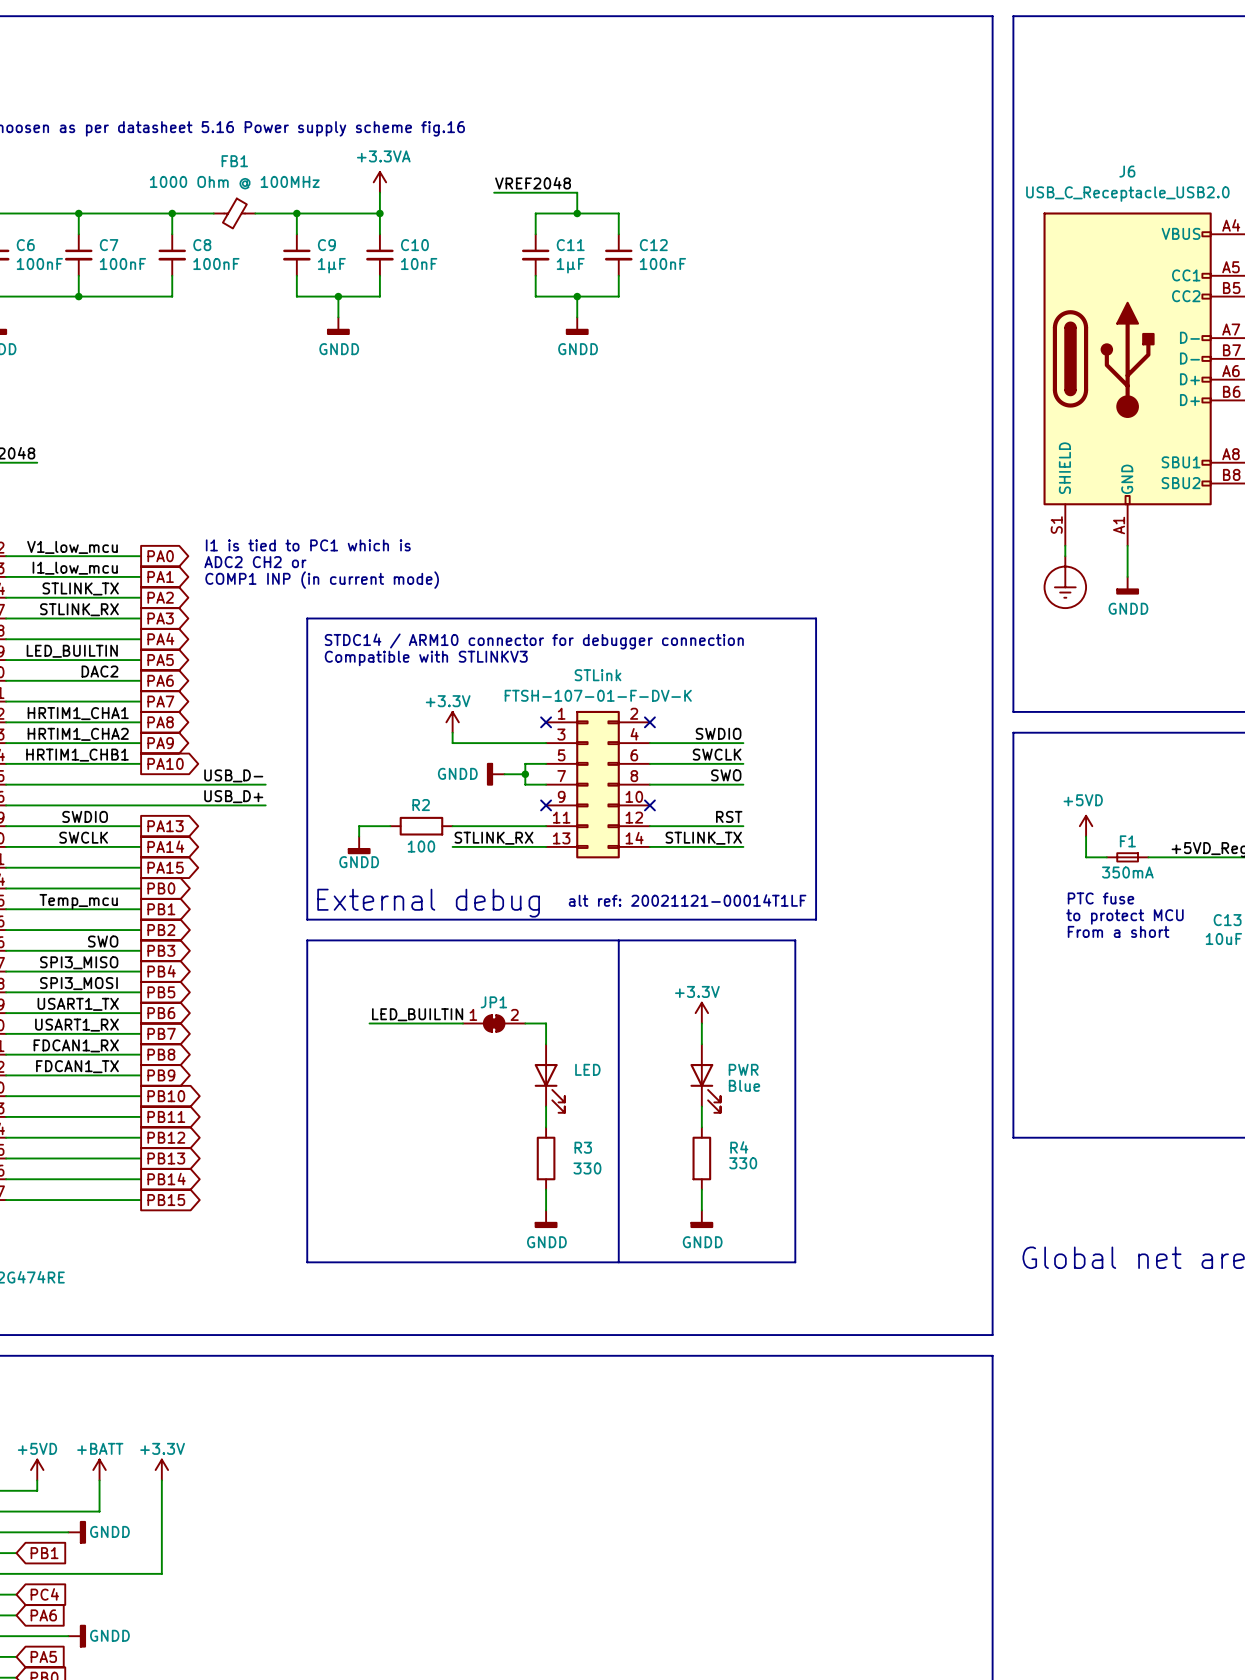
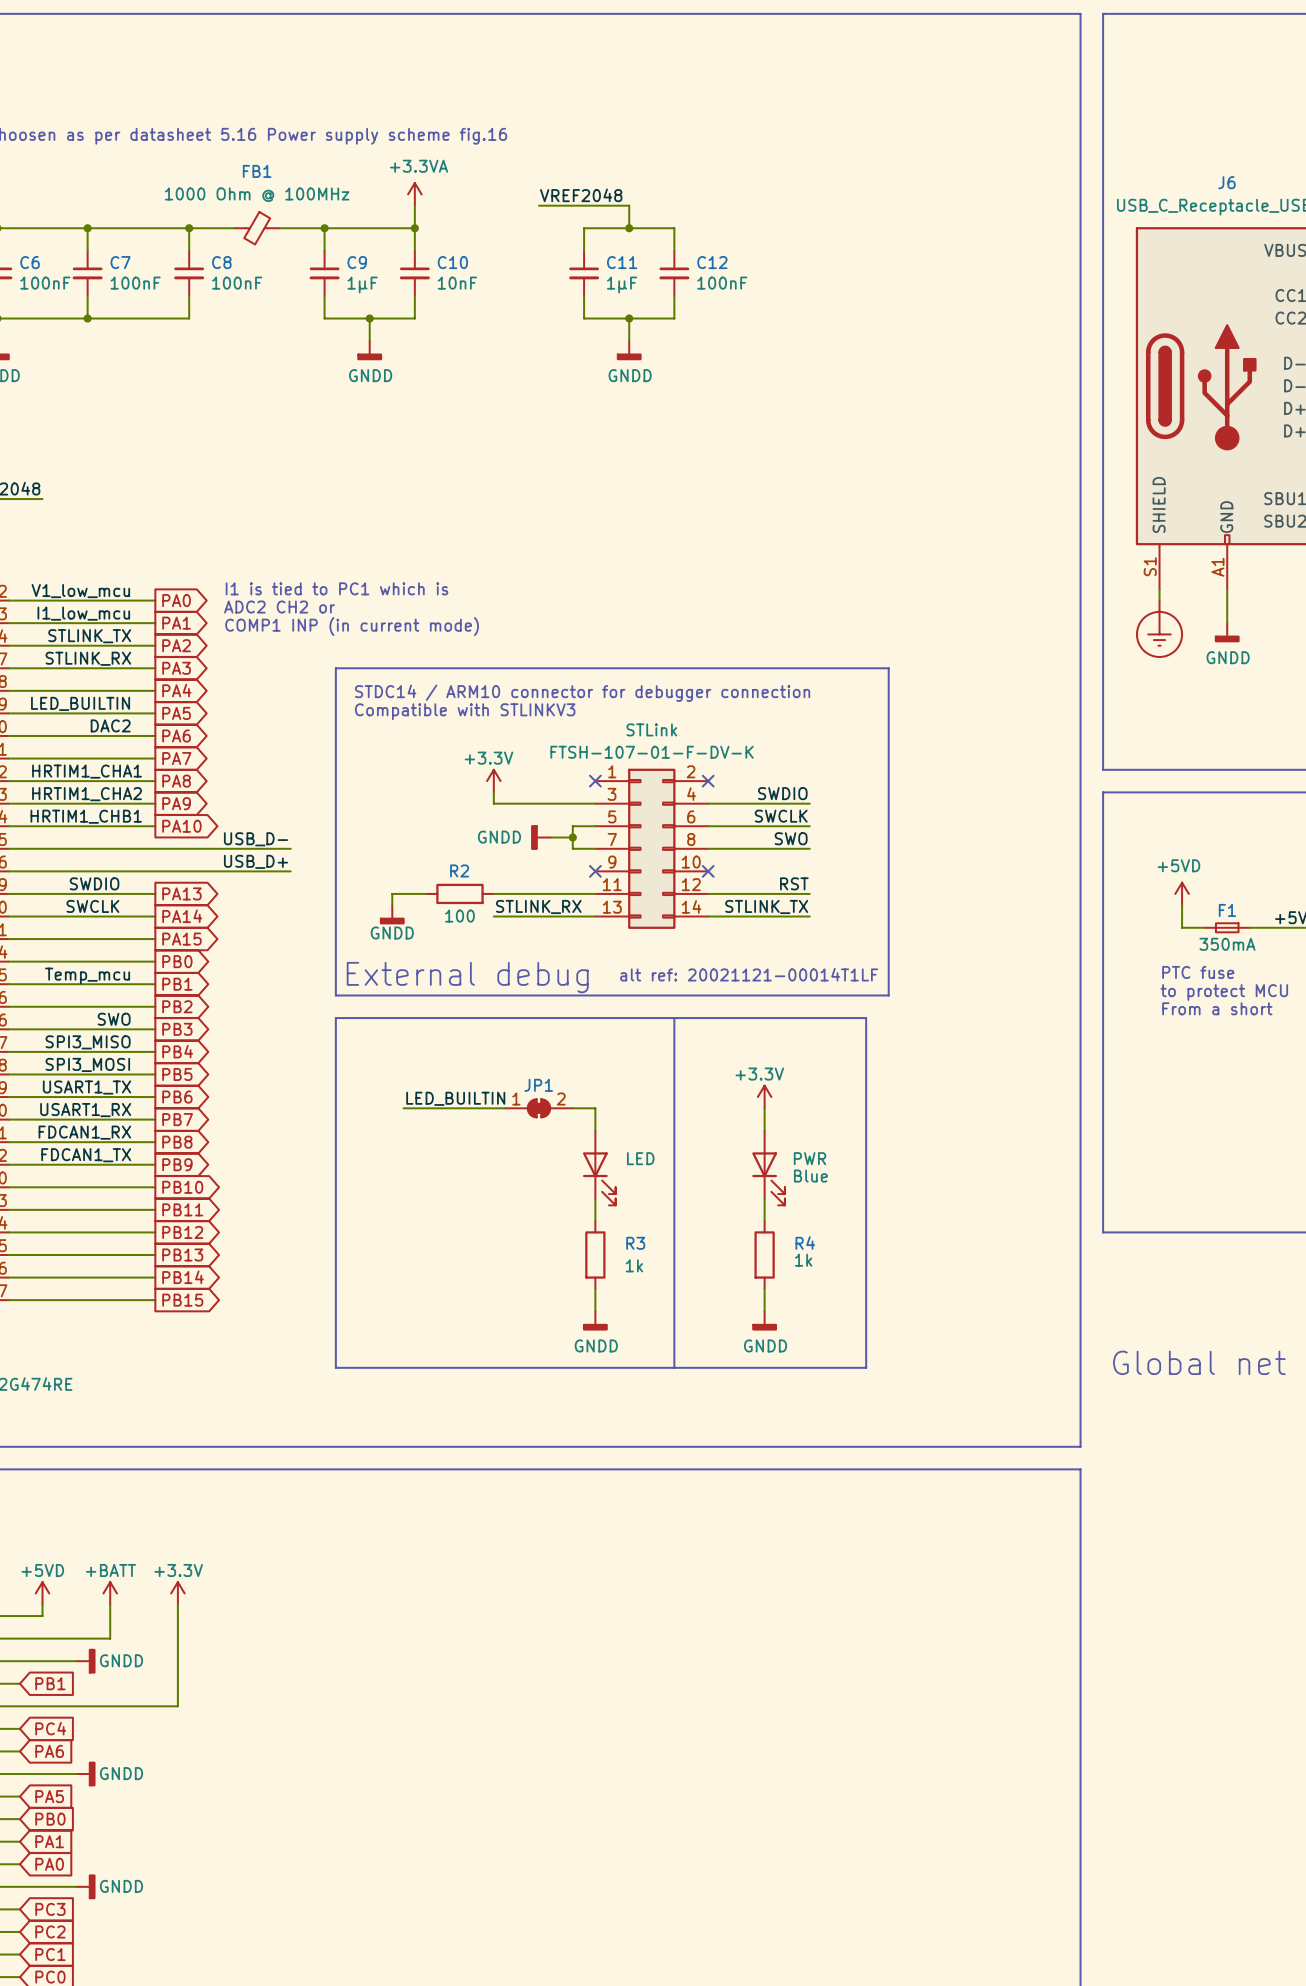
R4 value: 330 (743, 1163) -> 1k (803, 1260)
R3 value: 330 (587, 1168) -> 1k (634, 1265)

